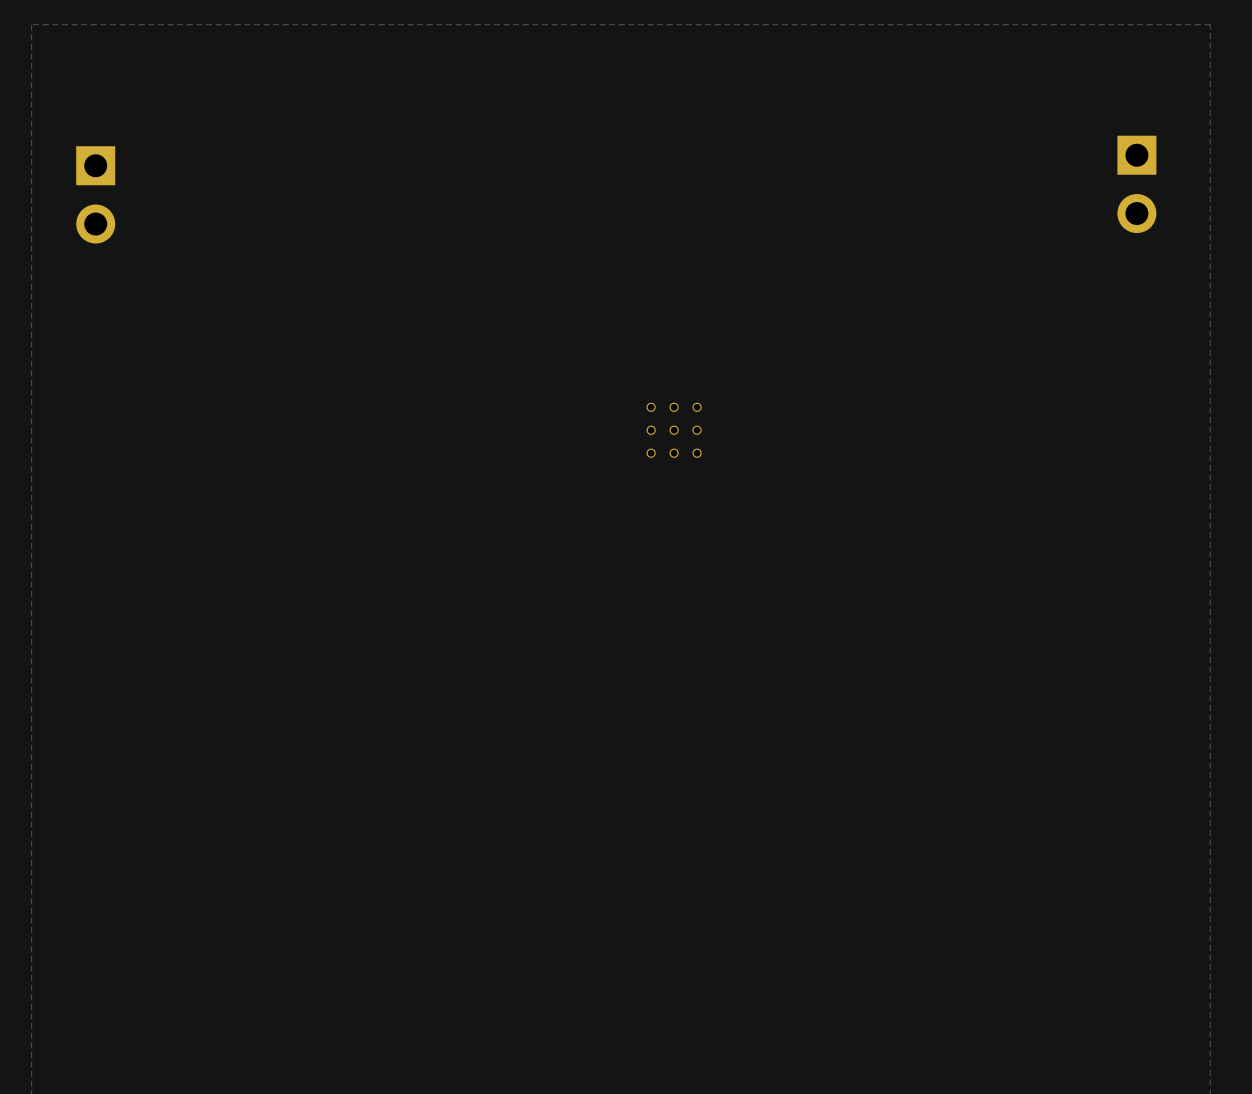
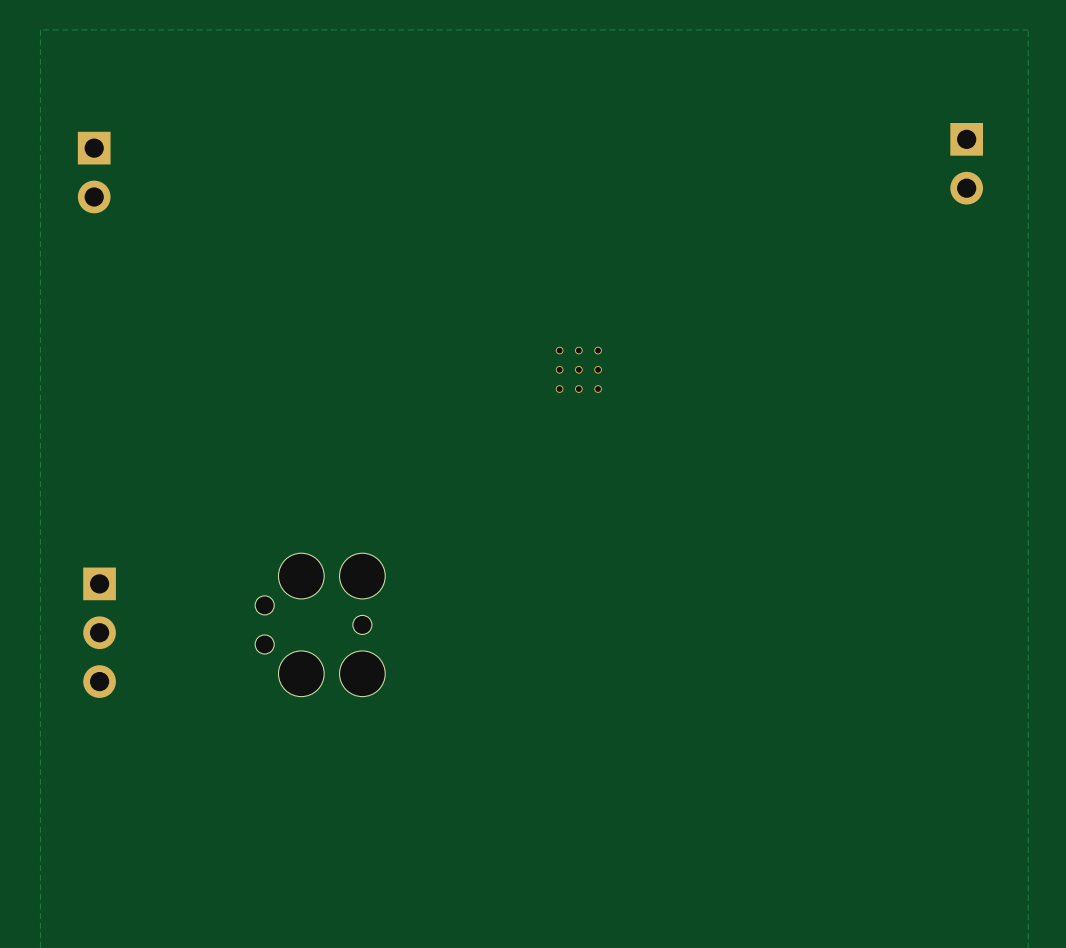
part: none -> (320, 624)
part: none -> (99, 632)

